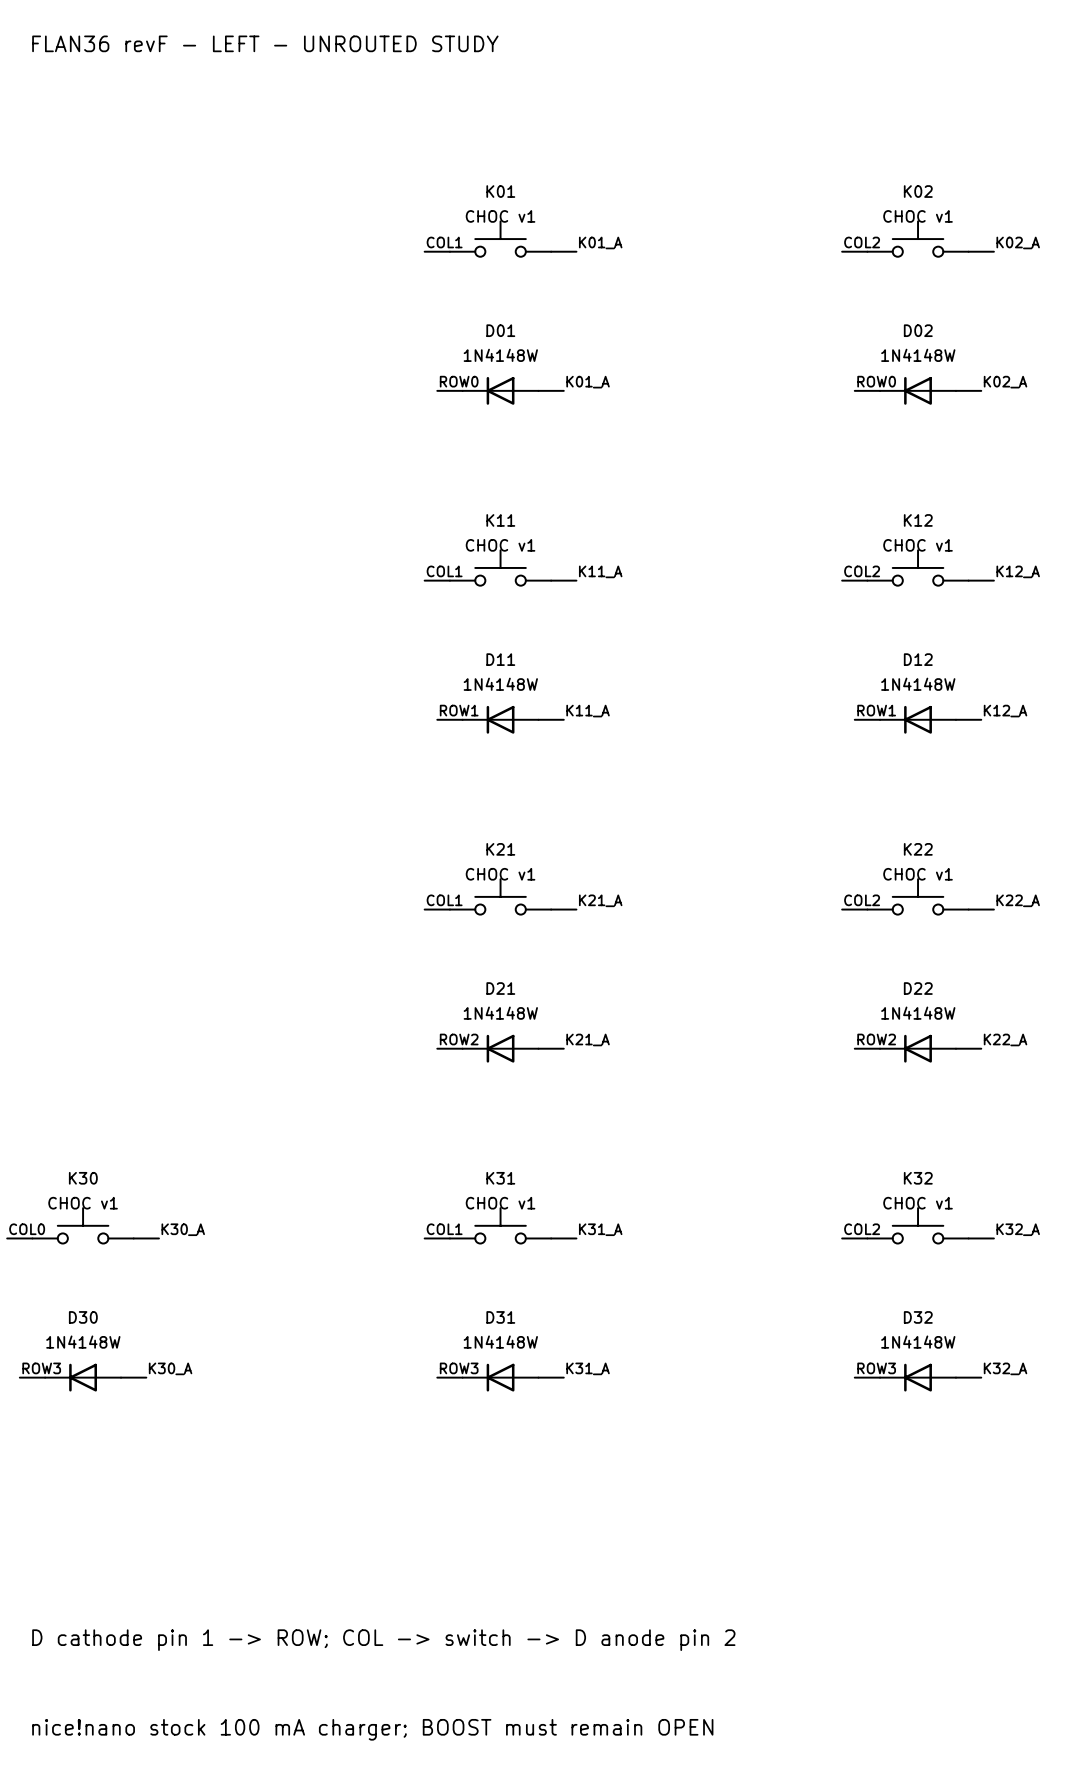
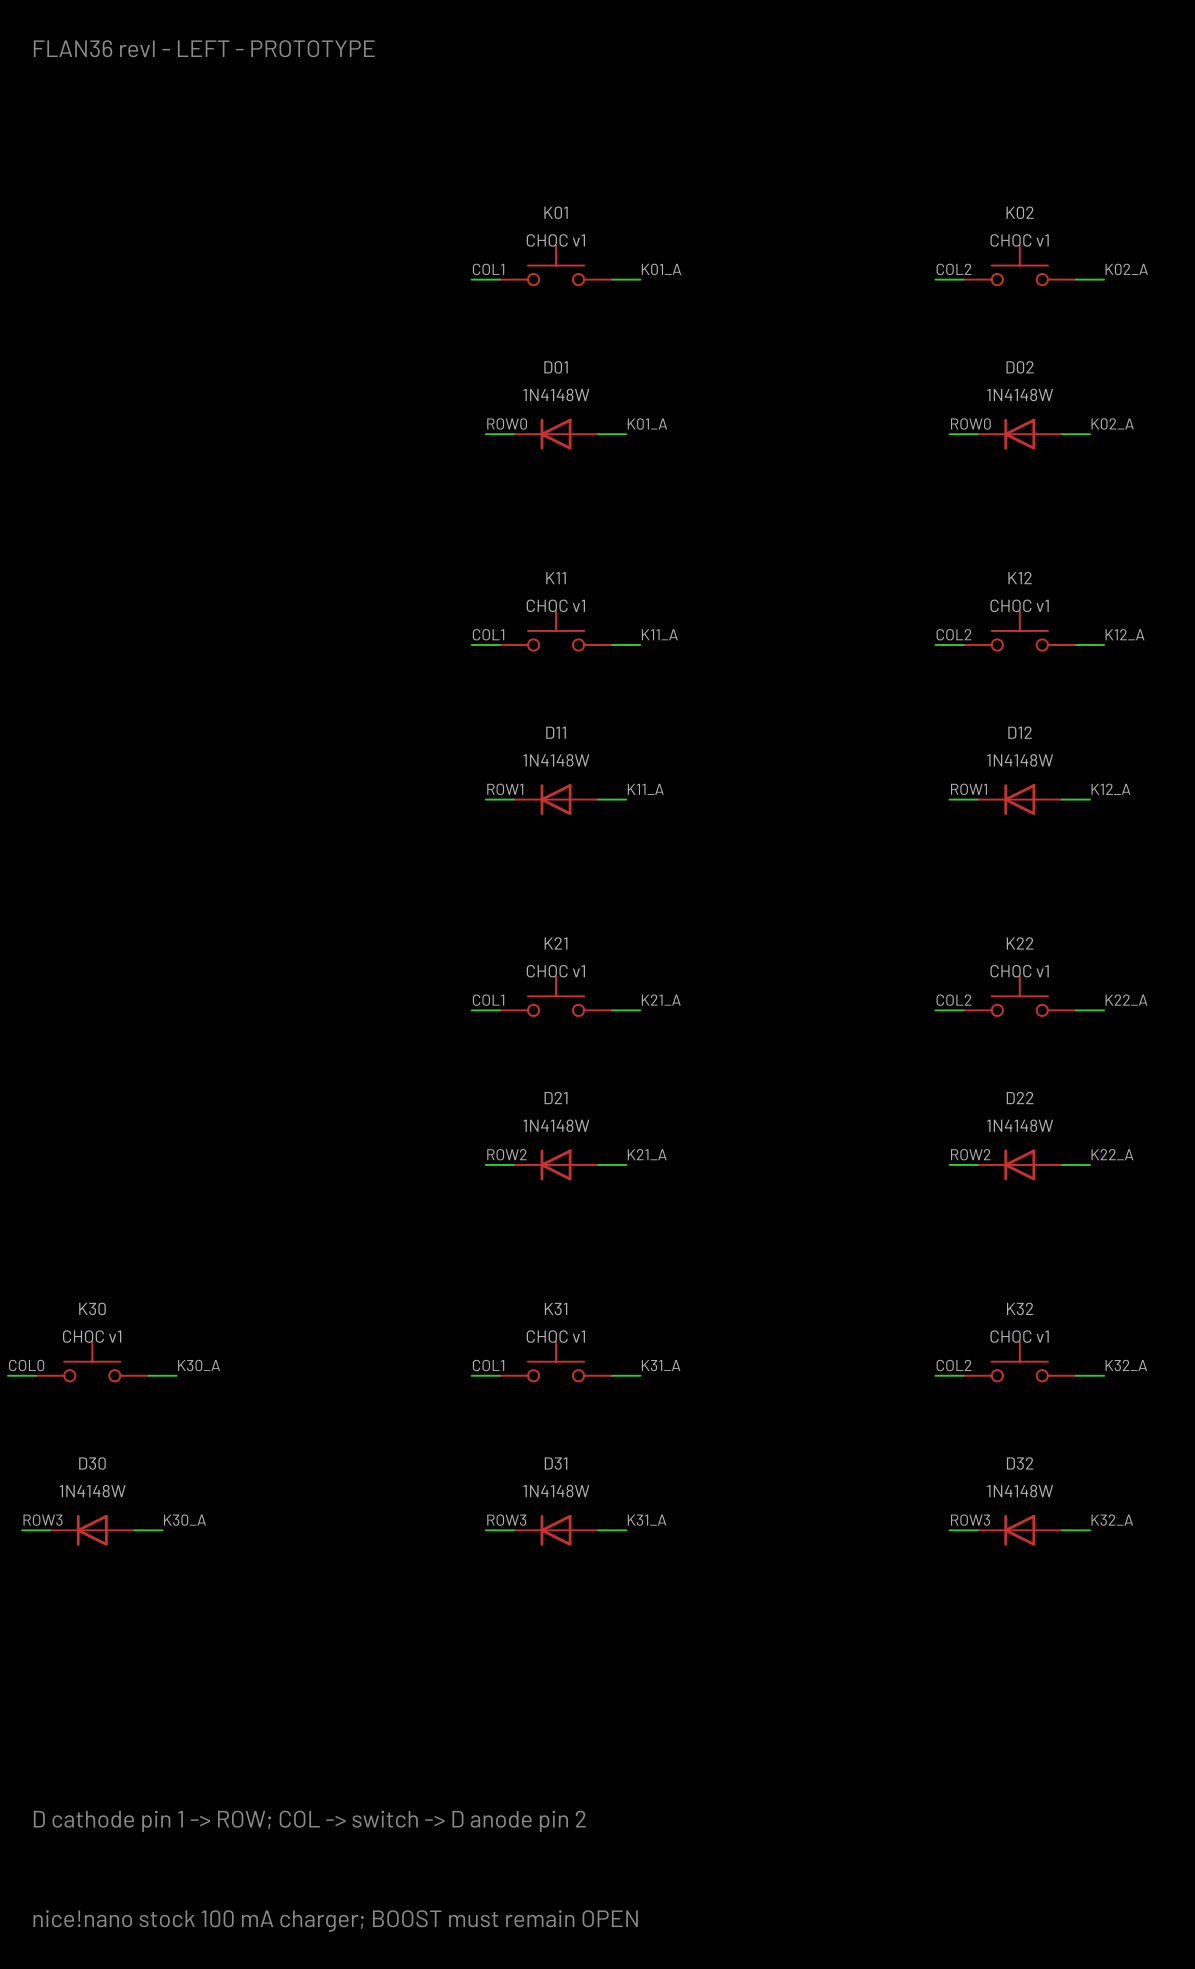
text: FLAN36 revF - LEFT - UNROUTED STUDY (265, 43) -> FLAN36 revI - LEFT - PROTOTYPE (204, 48)

